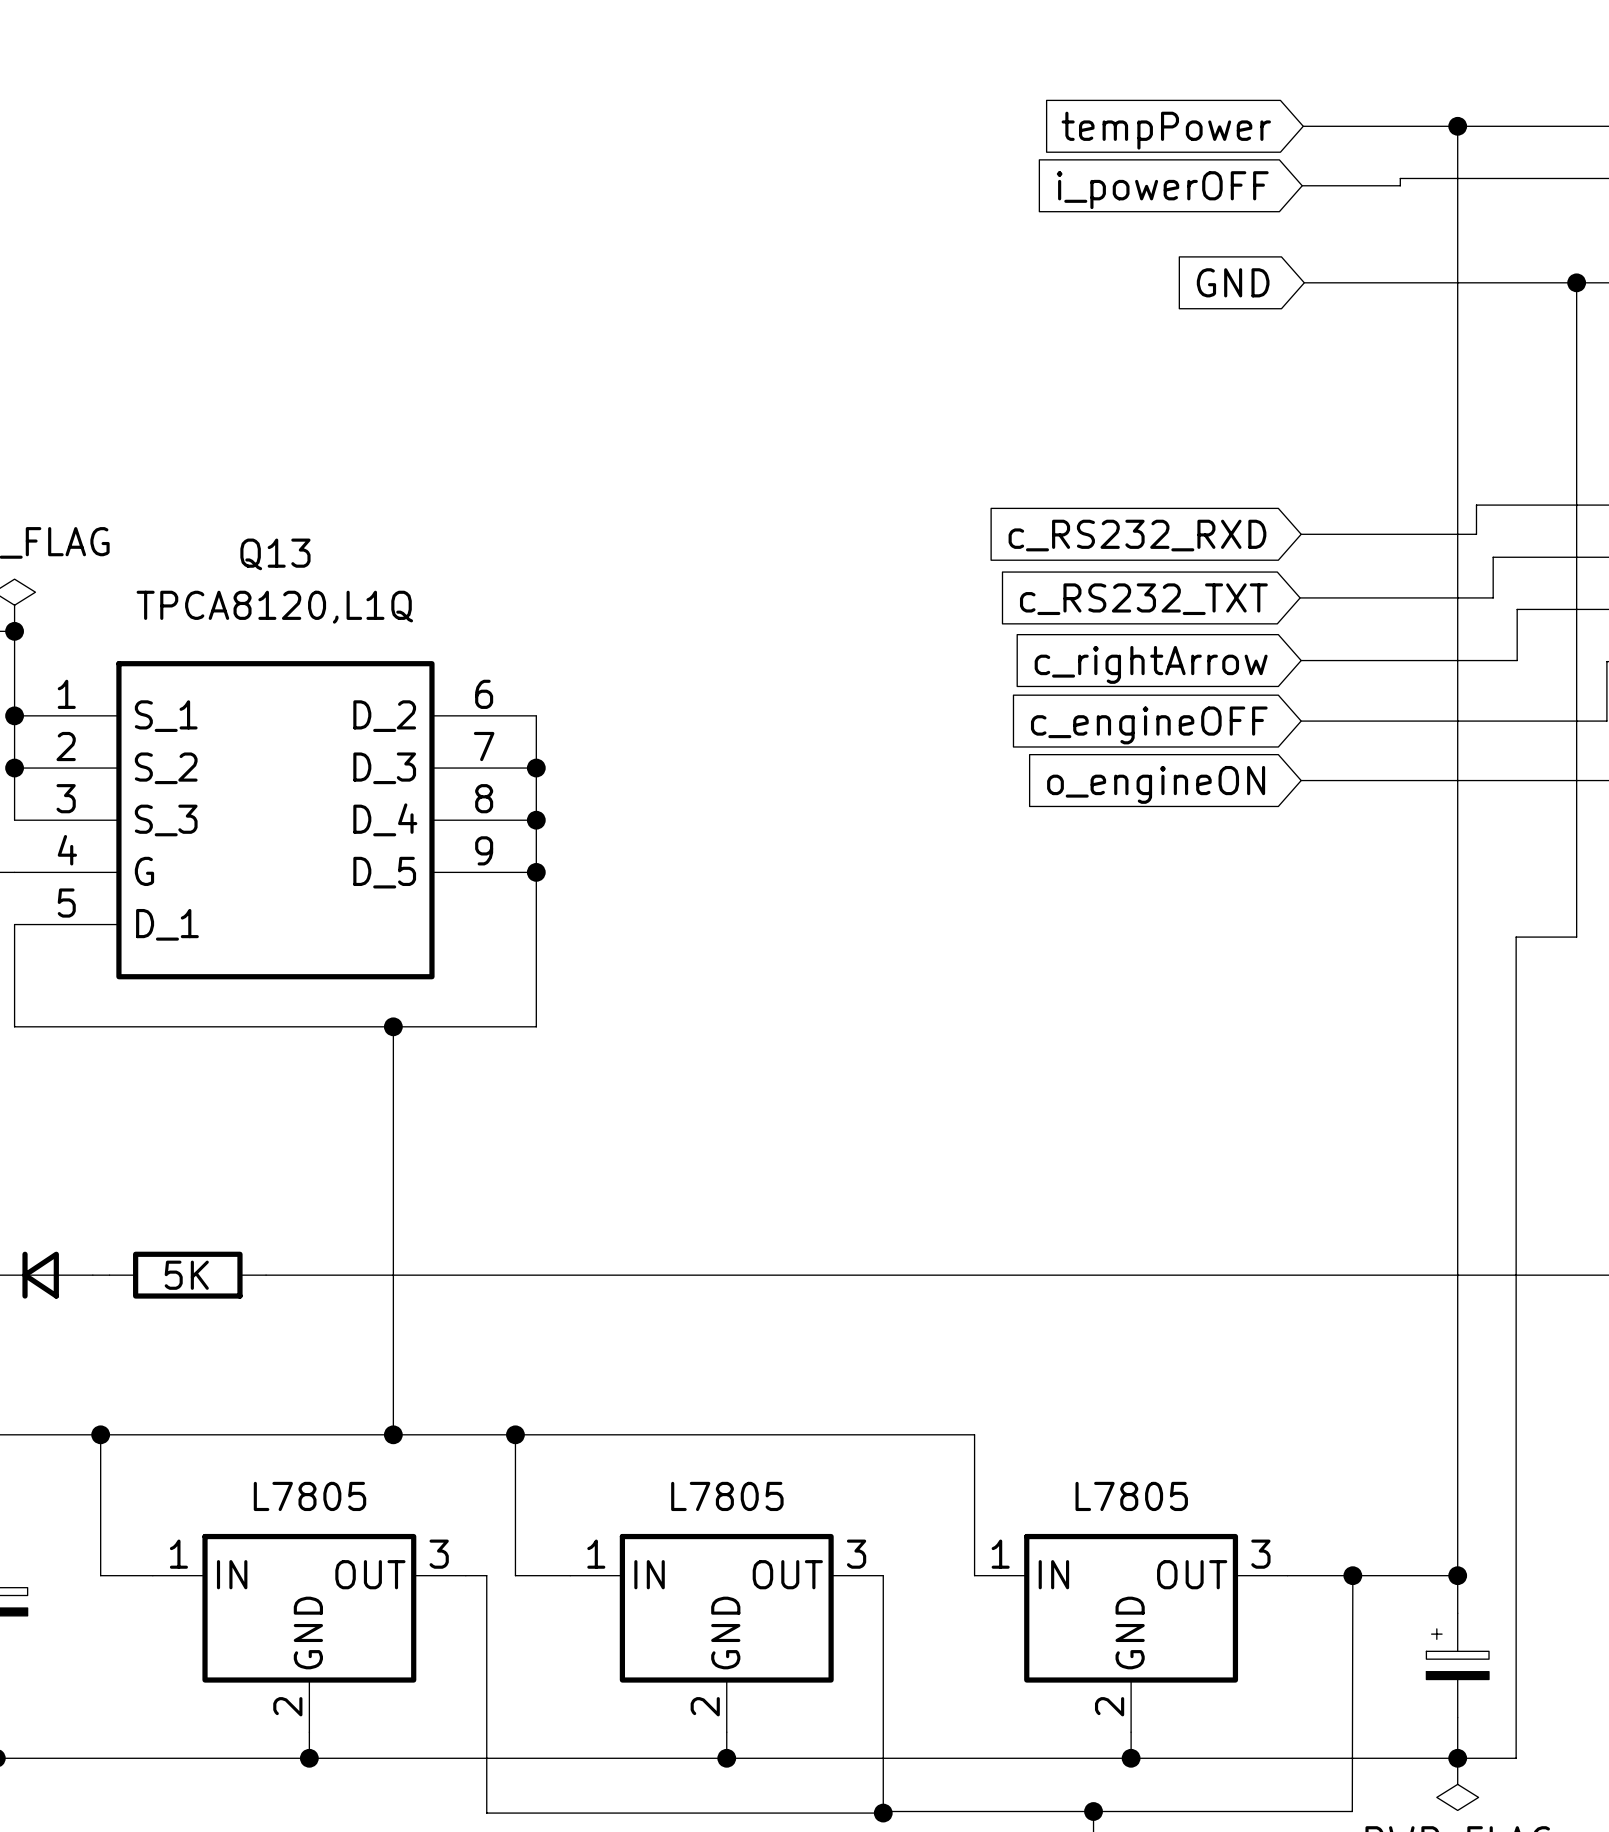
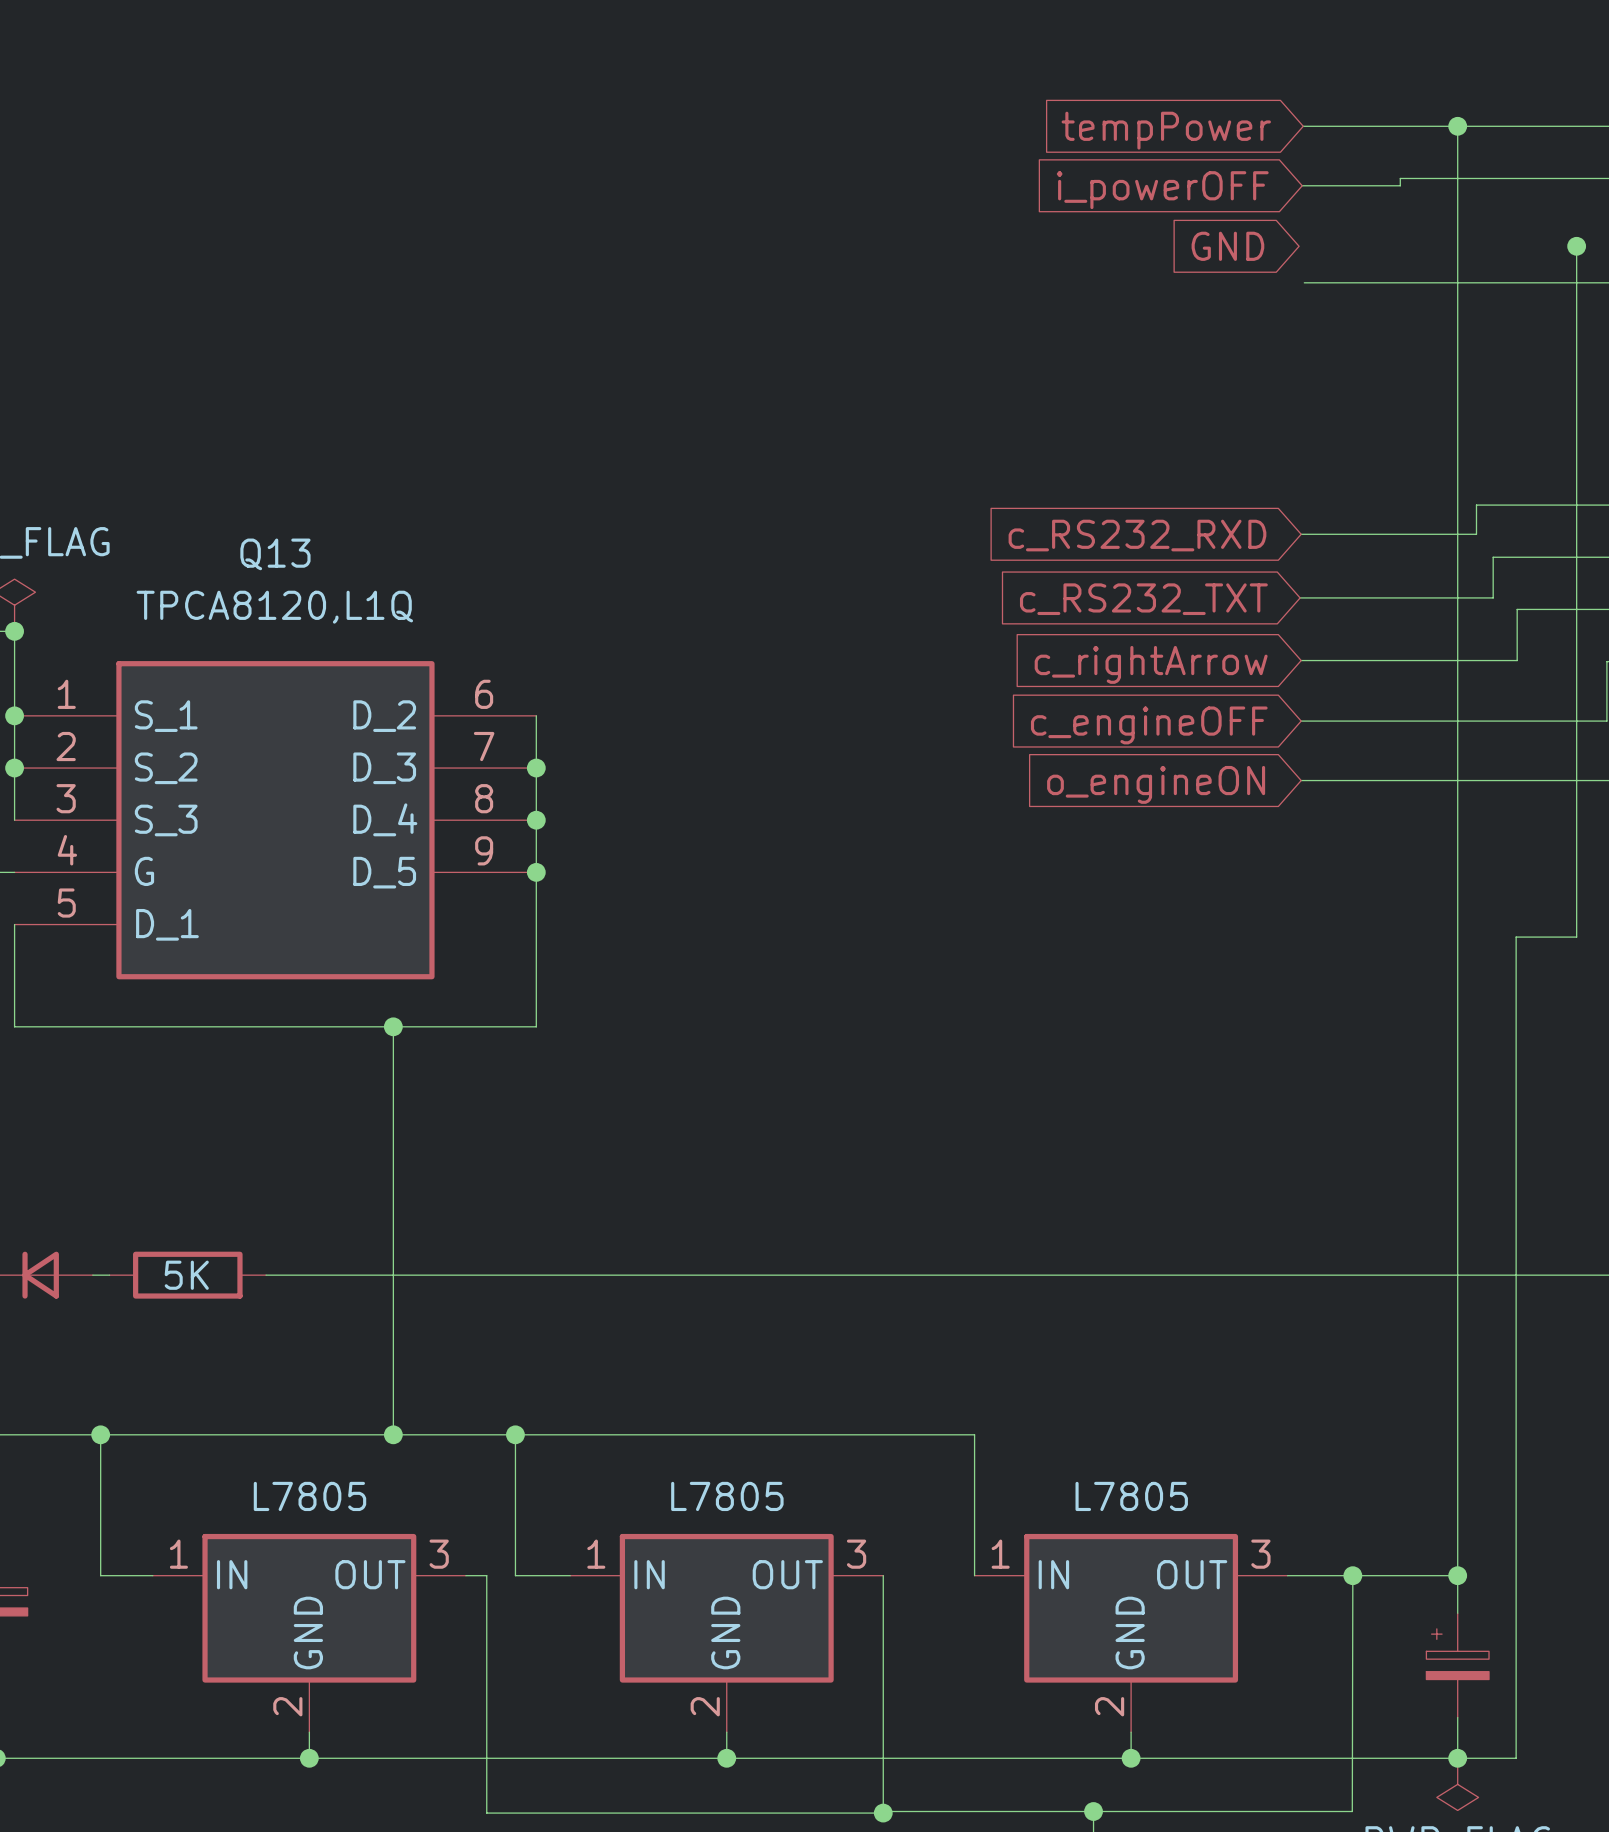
wire: none -> (1576, 246) (1576, 282)
global label position: GND (1233, 282) -> GND (1227, 246)
junction position: (1576, 282) -> (1576, 246)

